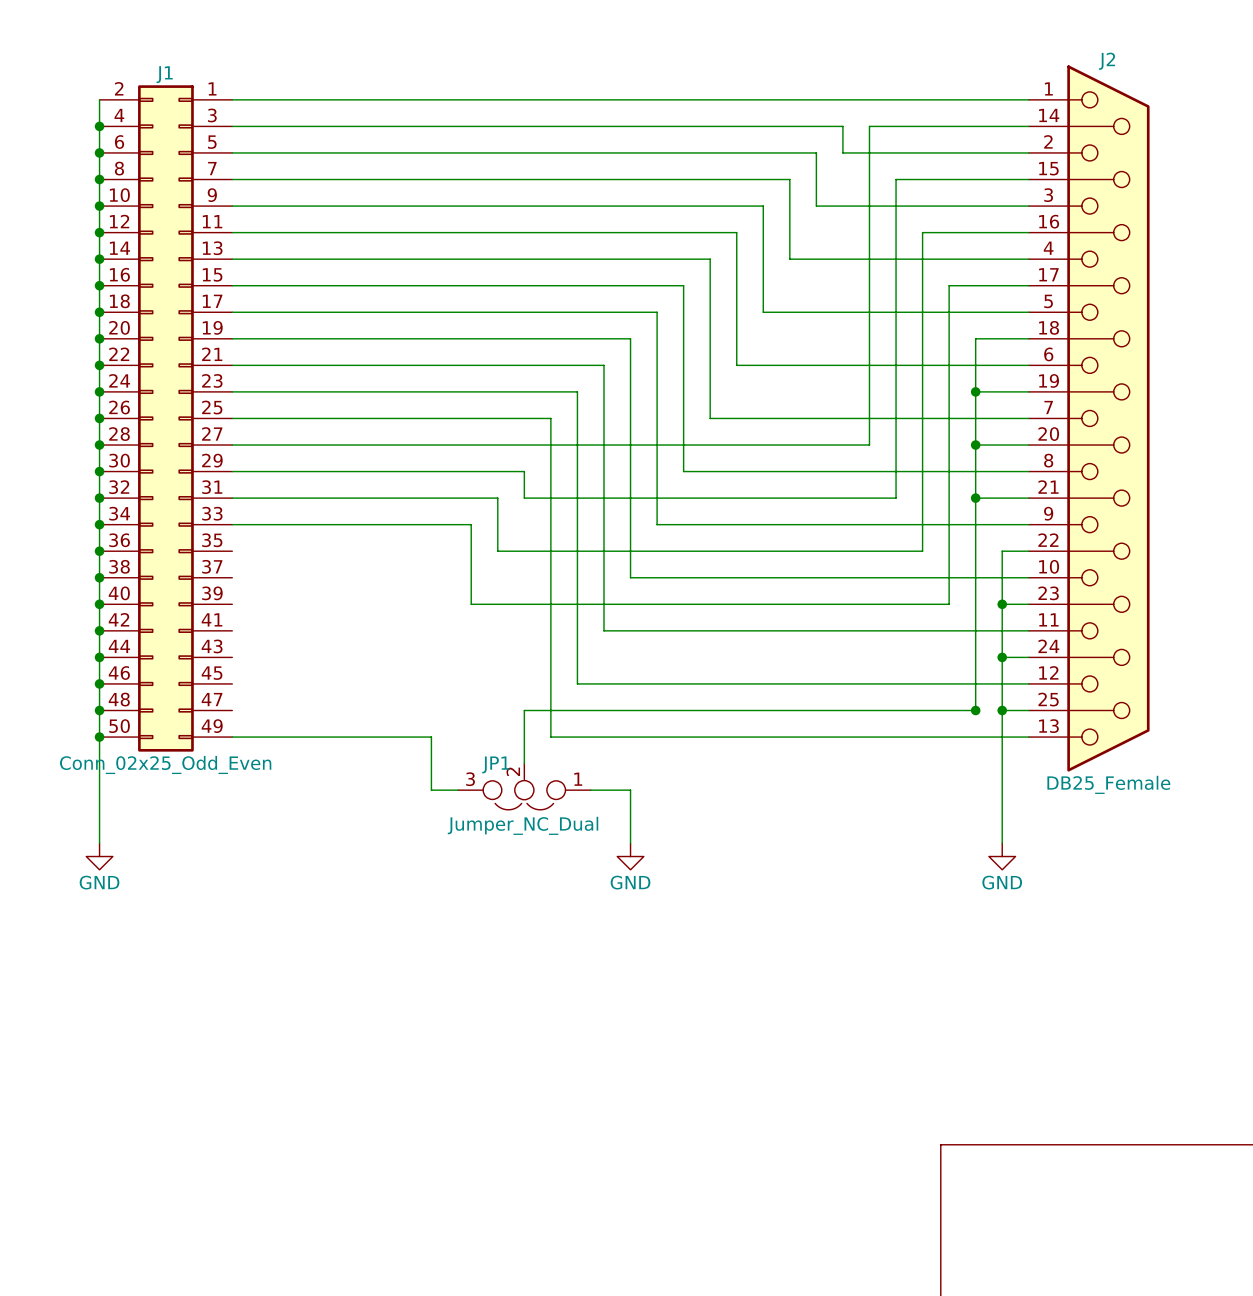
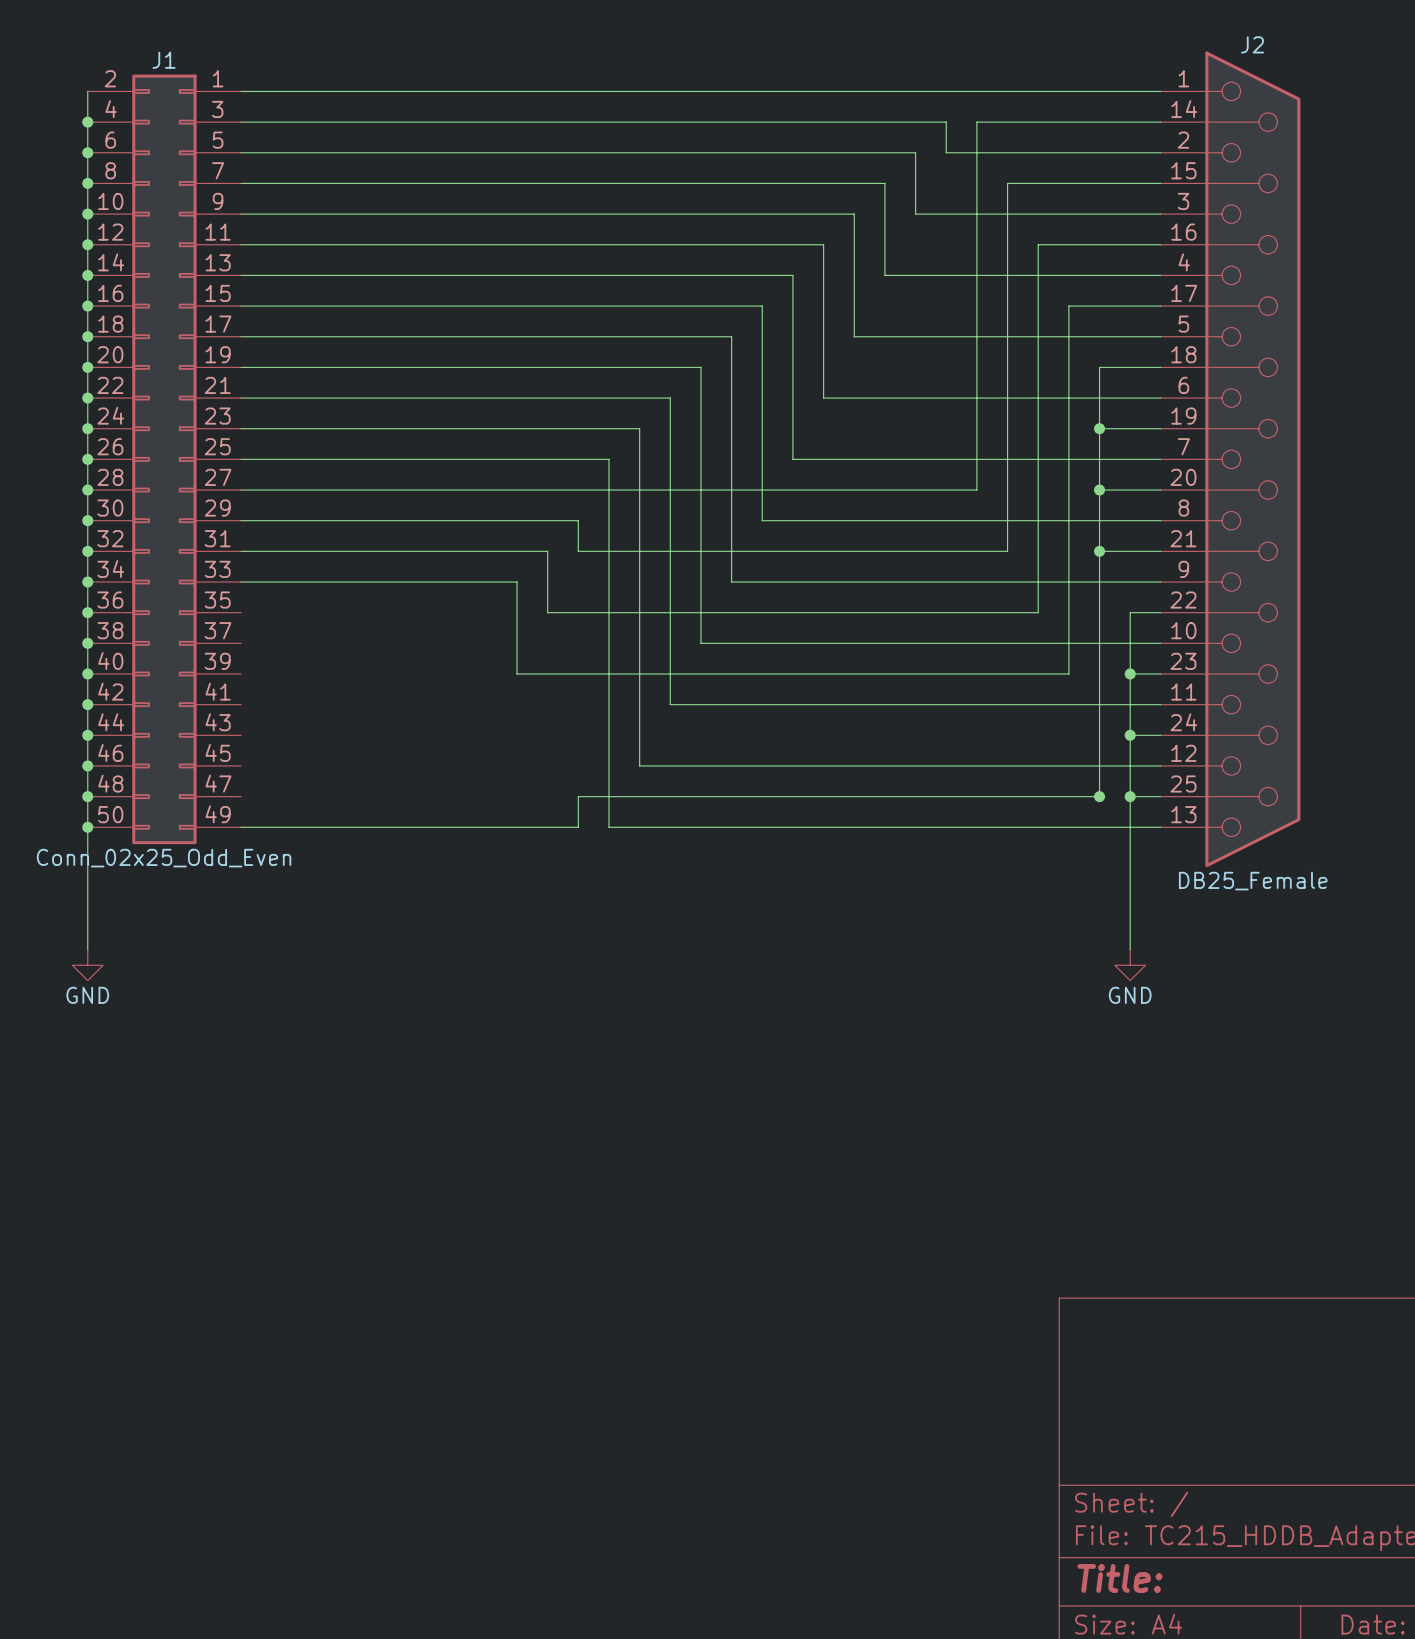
wire: (431, 737) (431, 790) (457, 790) -> (471, 827) (578, 827)
wire: (524, 737) (524, 763) -> none
JP1: Jumper_NC_Dual (524, 786) -> none
wire: (590, 790) (630, 790) (630, 843) -> none
power symbol: GND (630, 856) -> none

